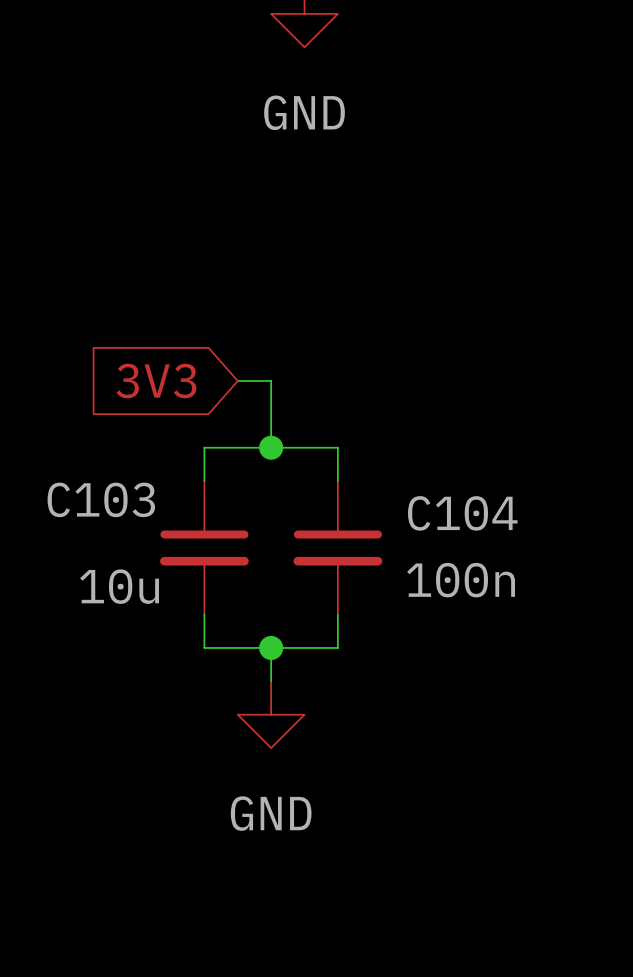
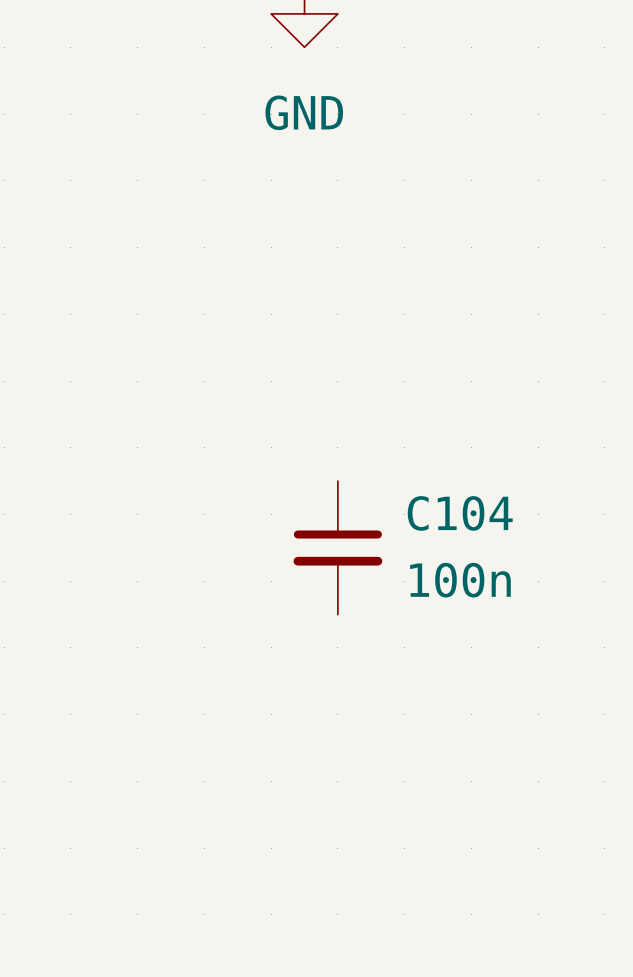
global label: 3V3 (156, 381) -> none
wire: (237, 381) (271, 381) (271, 447) -> none
junction: (271, 447) -> none
wire: (204, 481) (204, 447) (337, 447) (337, 481) -> none
C103: 10u (204, 547) -> none
wire: (204, 614) (204, 647) (337, 647) (337, 614) -> none
wire: (271, 647) (271, 681) -> none
junction: (271, 647) -> none
power symbol: GND (271, 714) -> none

